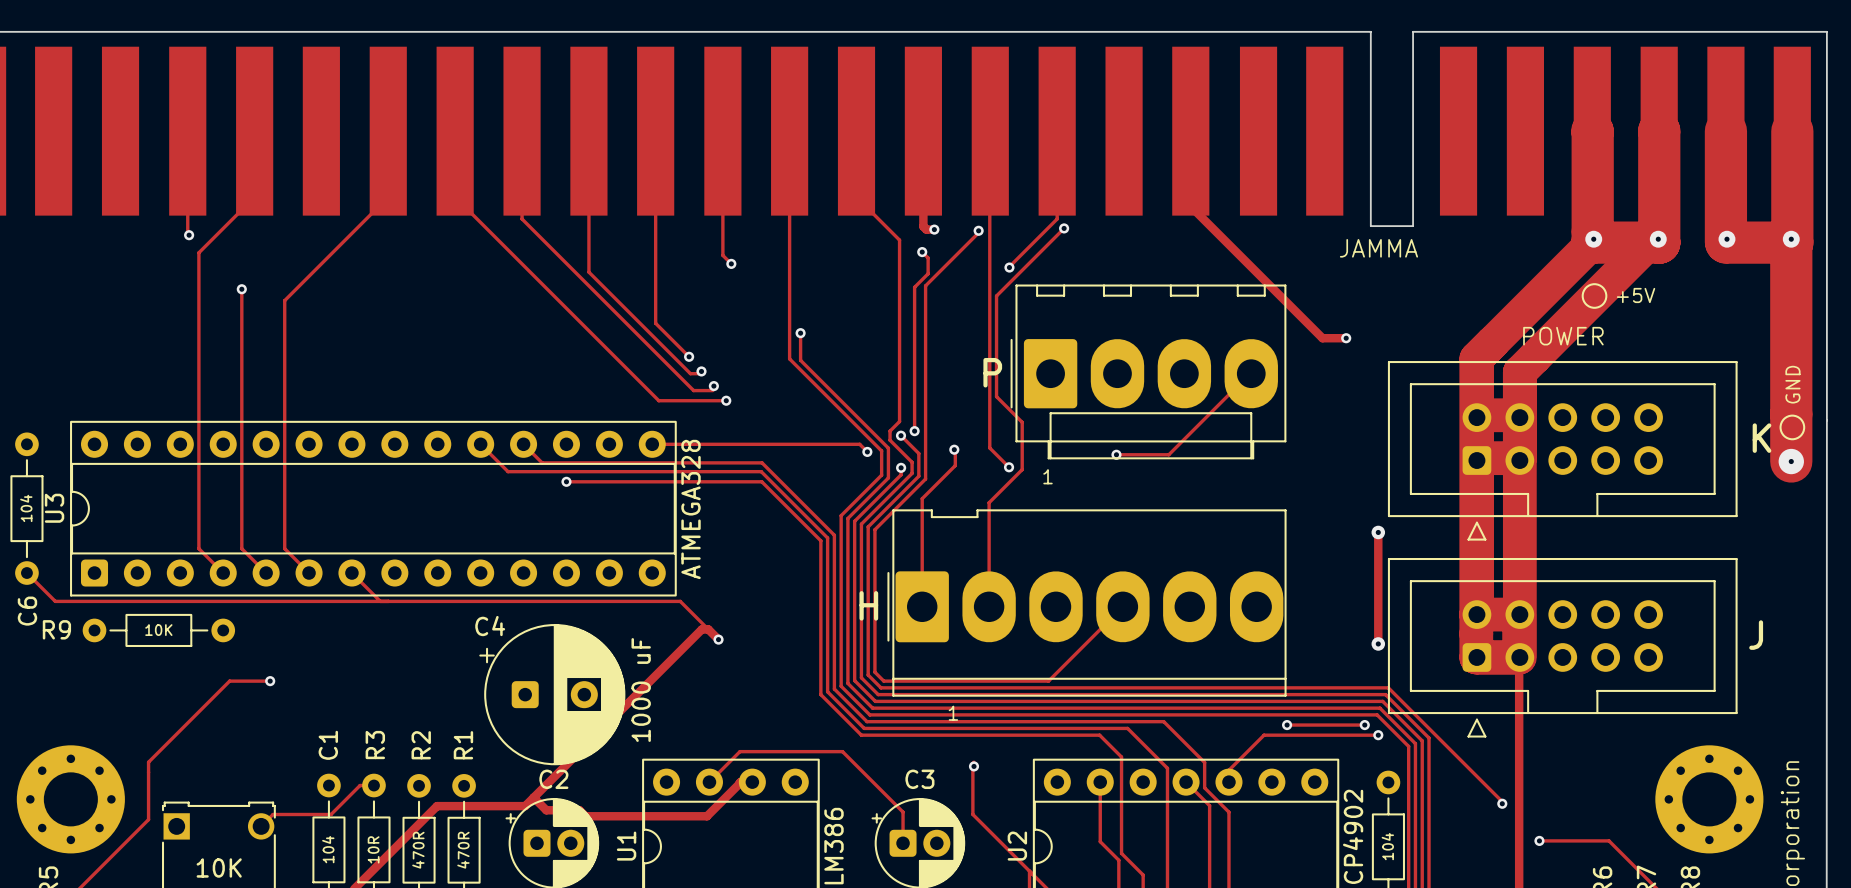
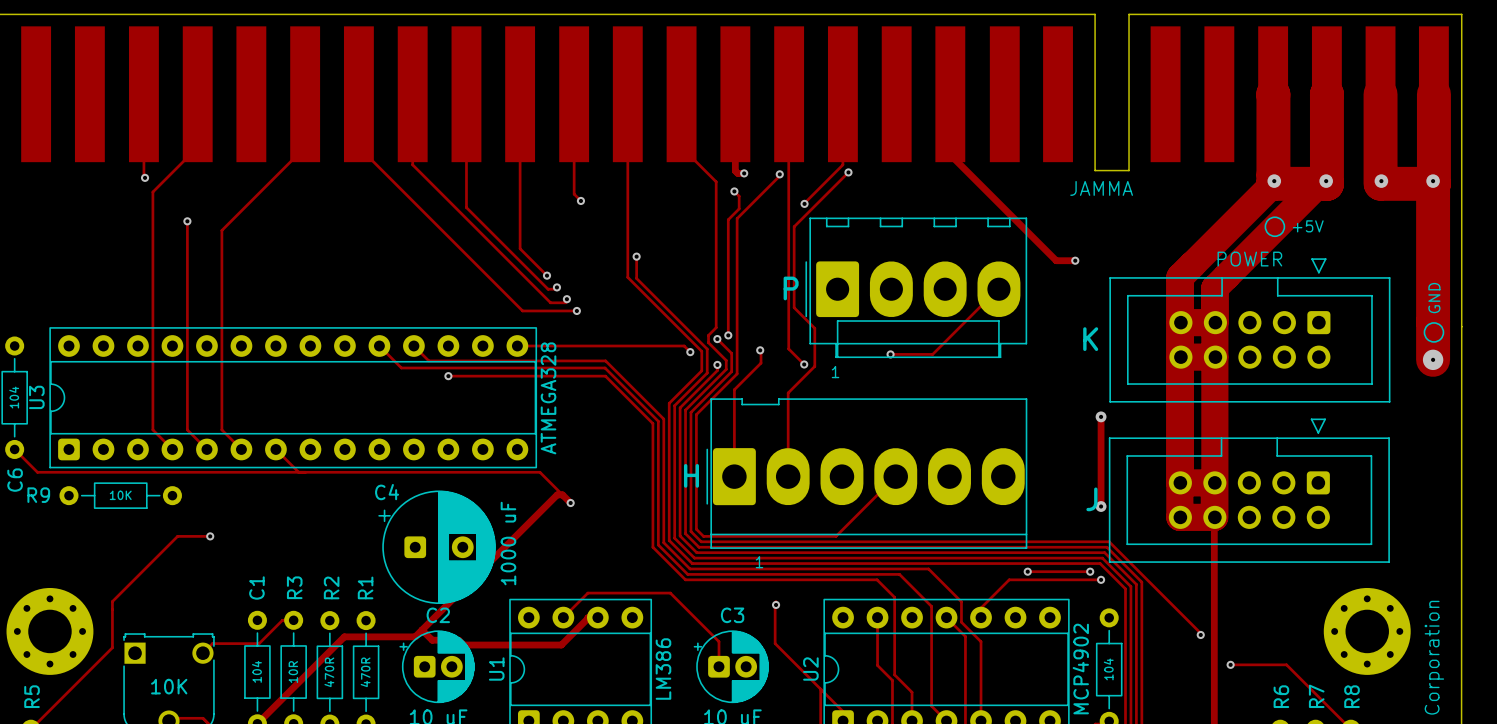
part rotation: 0° (1562, 450) -> 180° (1249, 330)
part rotation: 0° (1562, 647) -> 180° (1249, 490)

